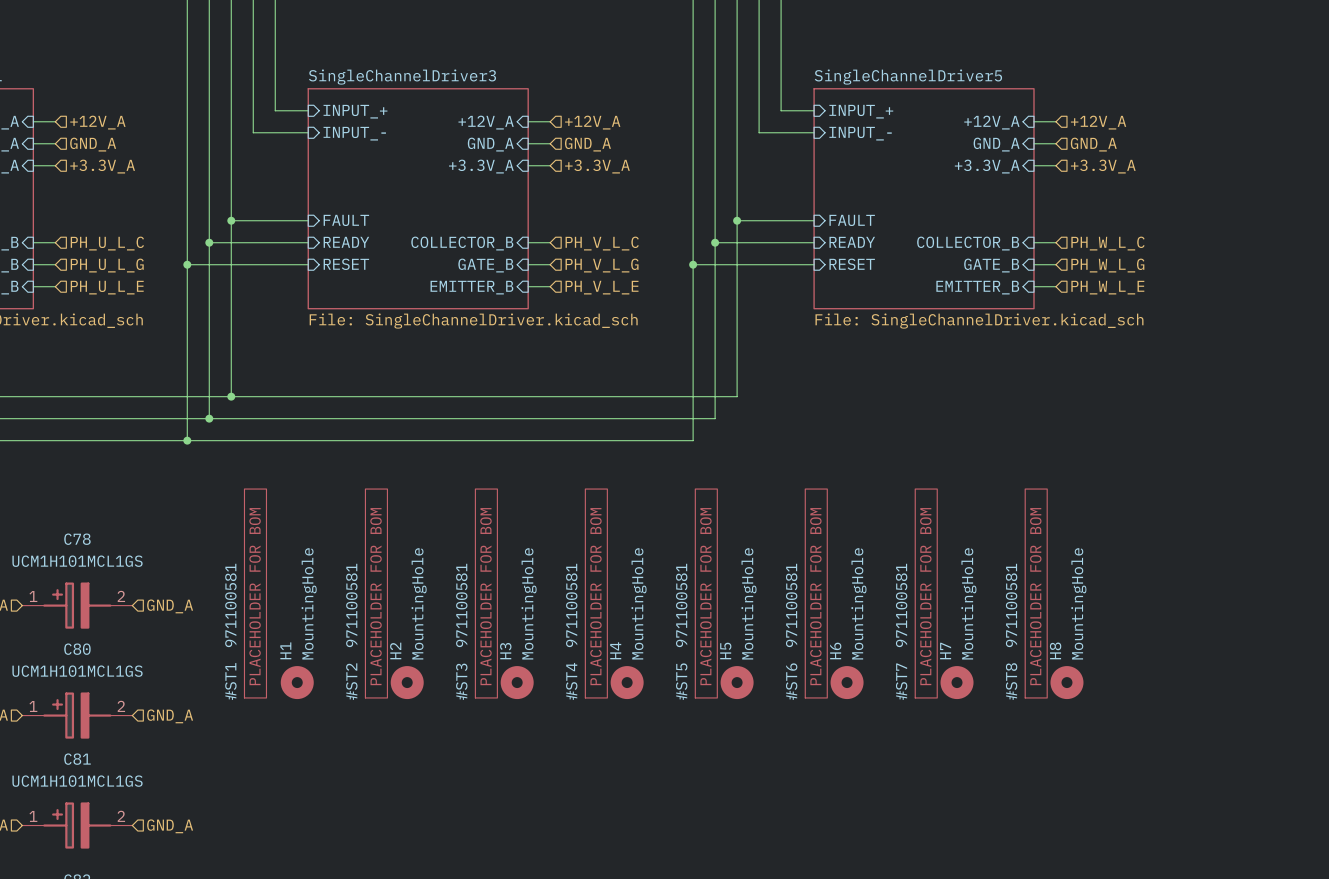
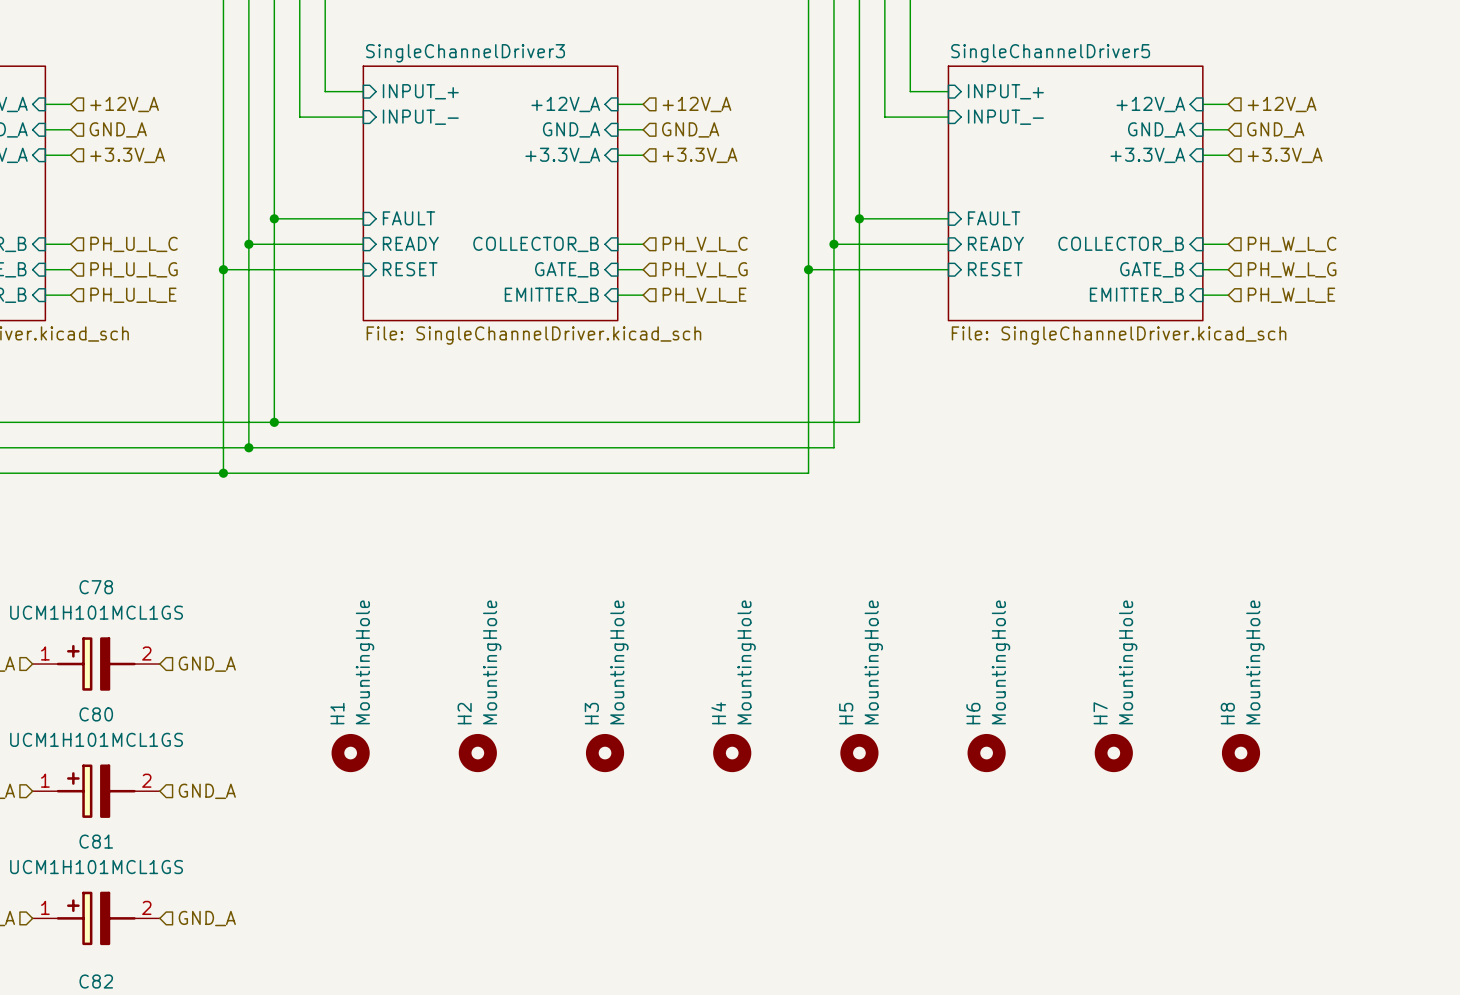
#ST1: 971100581 (255, 593) -> none
#ST2: 971100581 (376, 593) -> none
#ST3: 971100581 (486, 593) -> none
#ST4: 971100581 (596, 593) -> none
#ST5: 971100581 (706, 593) -> none
#ST6: 971100581 (816, 593) -> none
#ST7: 971100581 (926, 593) -> none
#ST8: 971100581 (1036, 593) -> none

